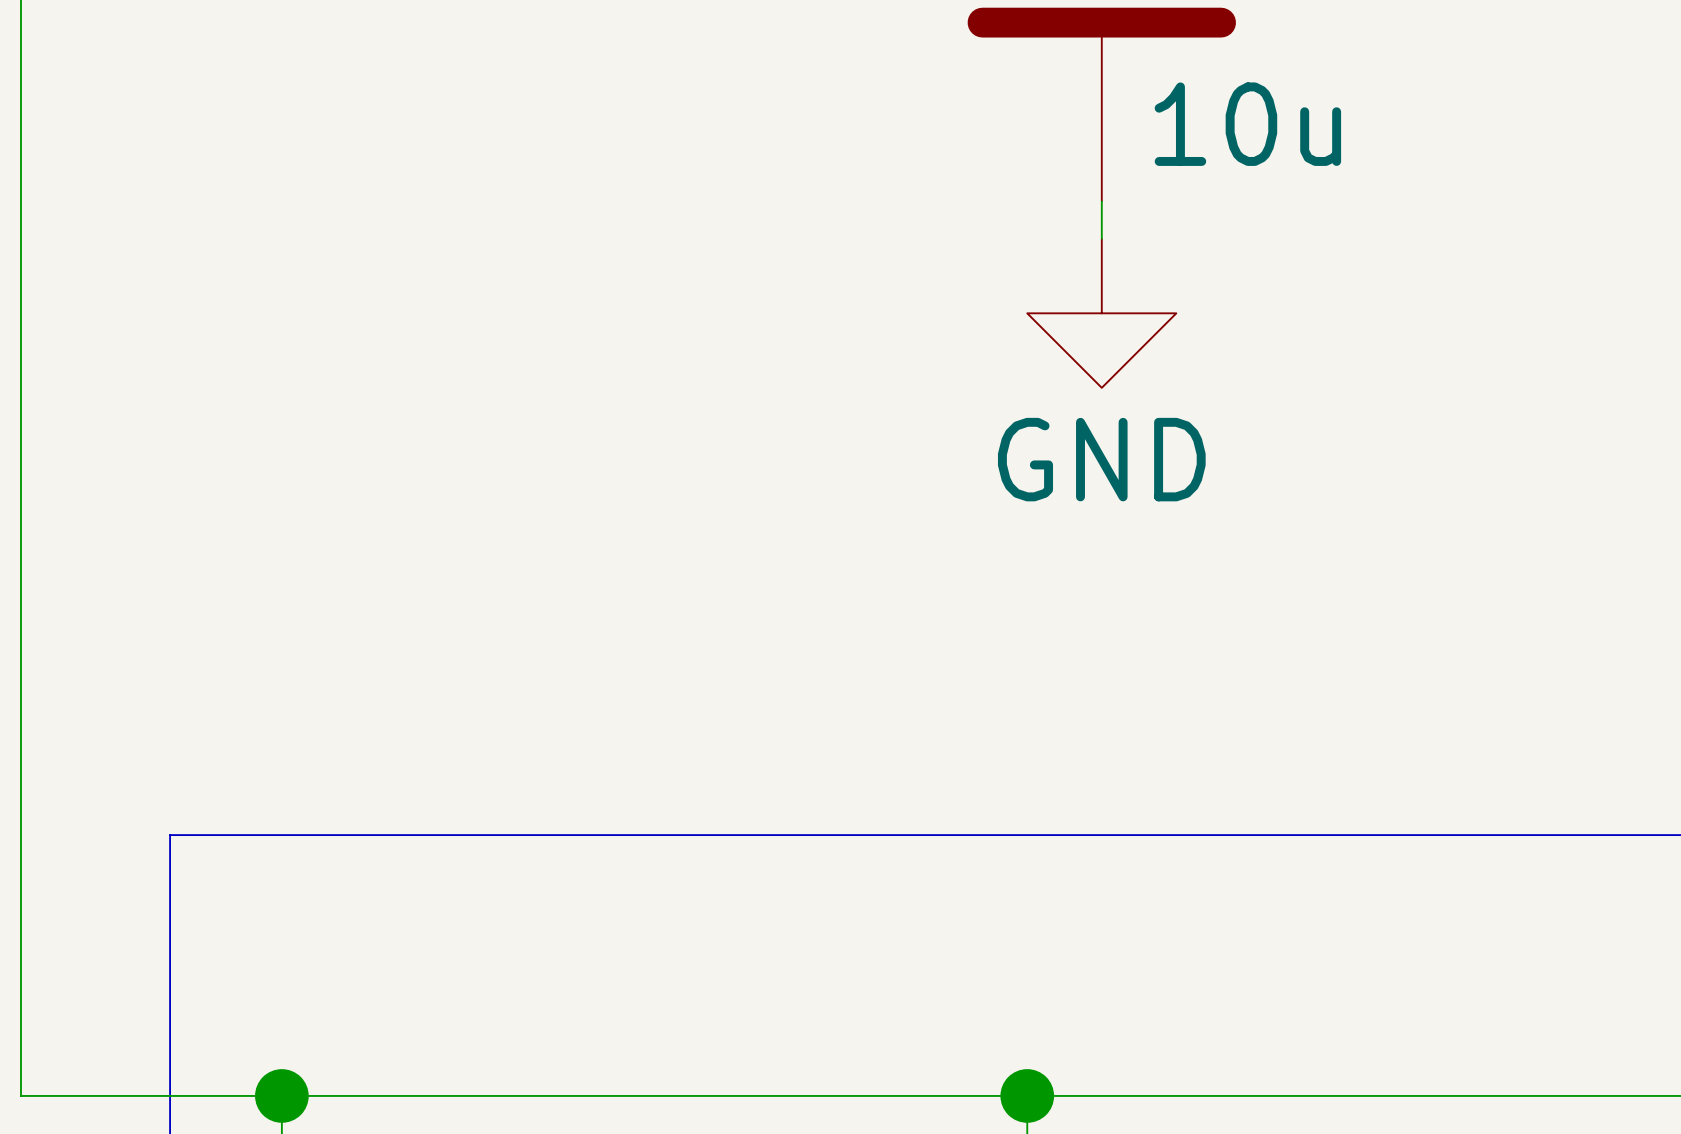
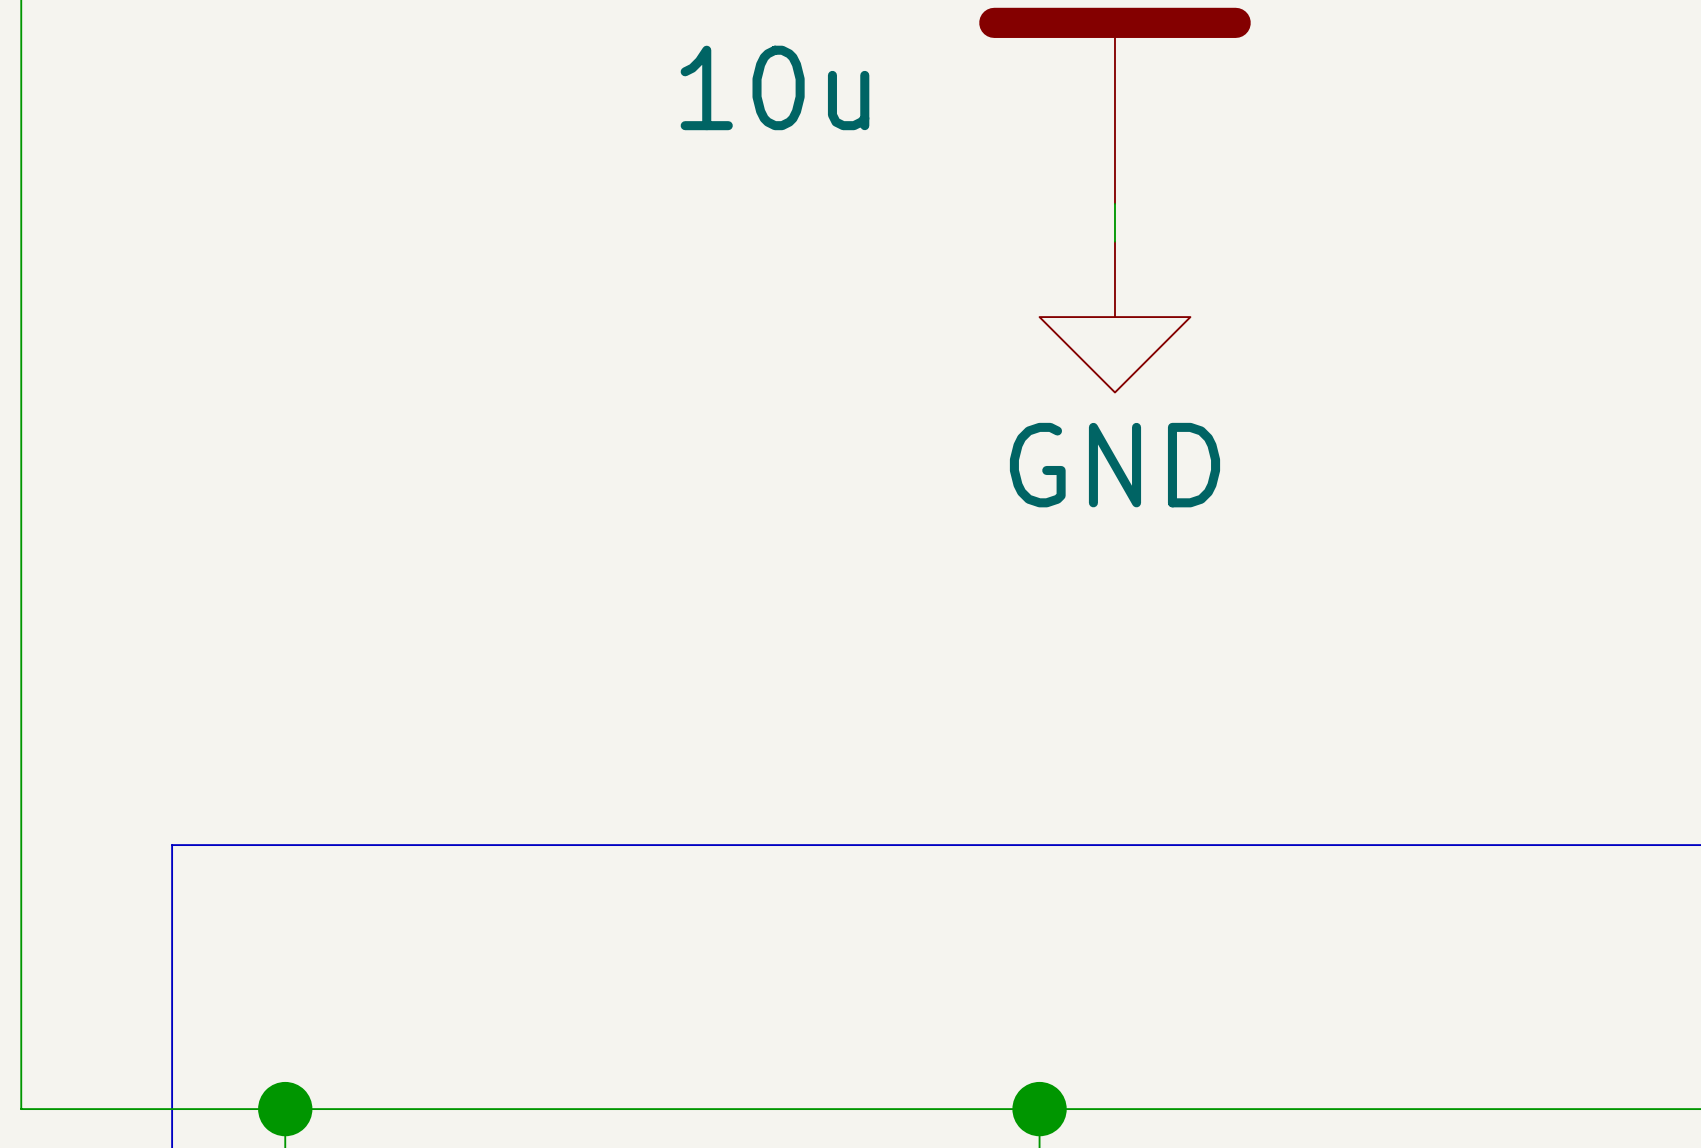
part text position: 10u (1247, 124) -> 10u (774, 87)

